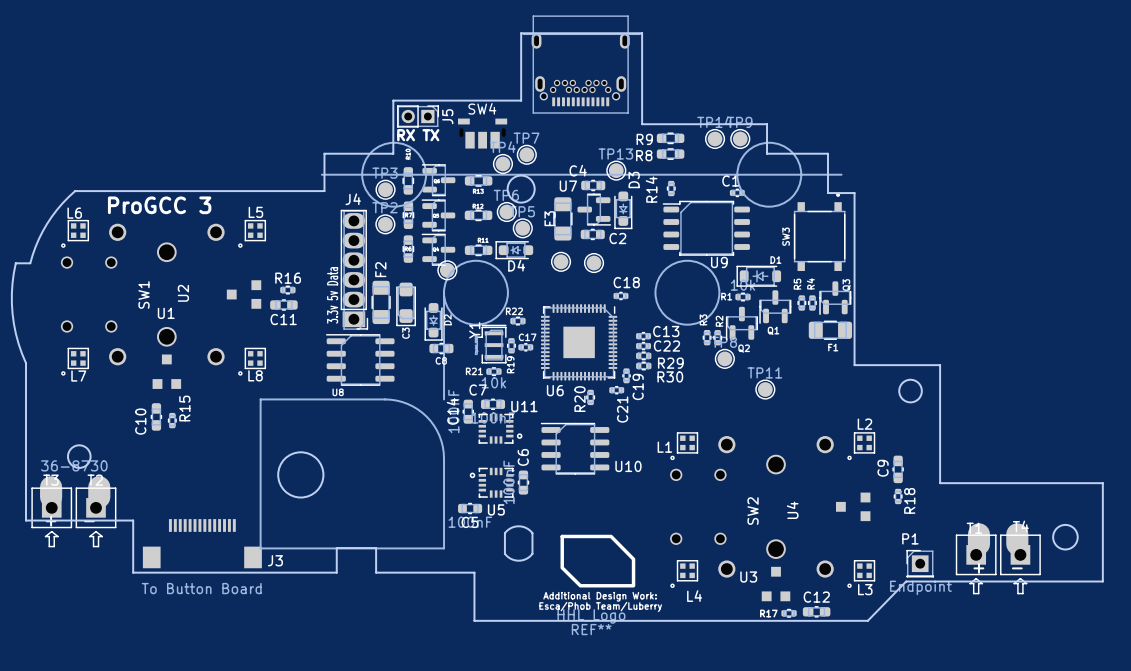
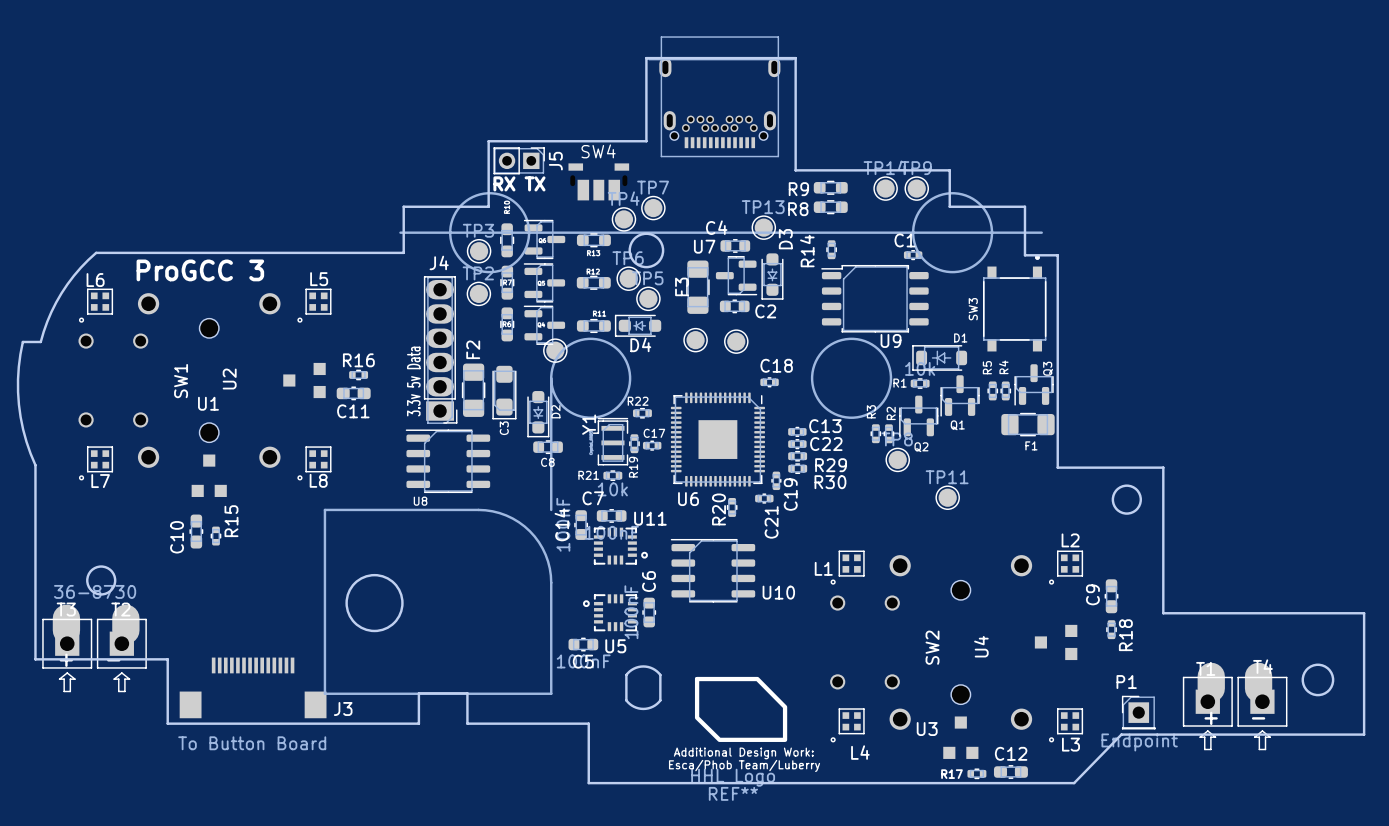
SW1 footprint: [60, 223, 225, 366] -> [78, 293, 281, 468]
SW2 footprint: [670, 436, 834, 578] -> [830, 555, 1033, 730]

